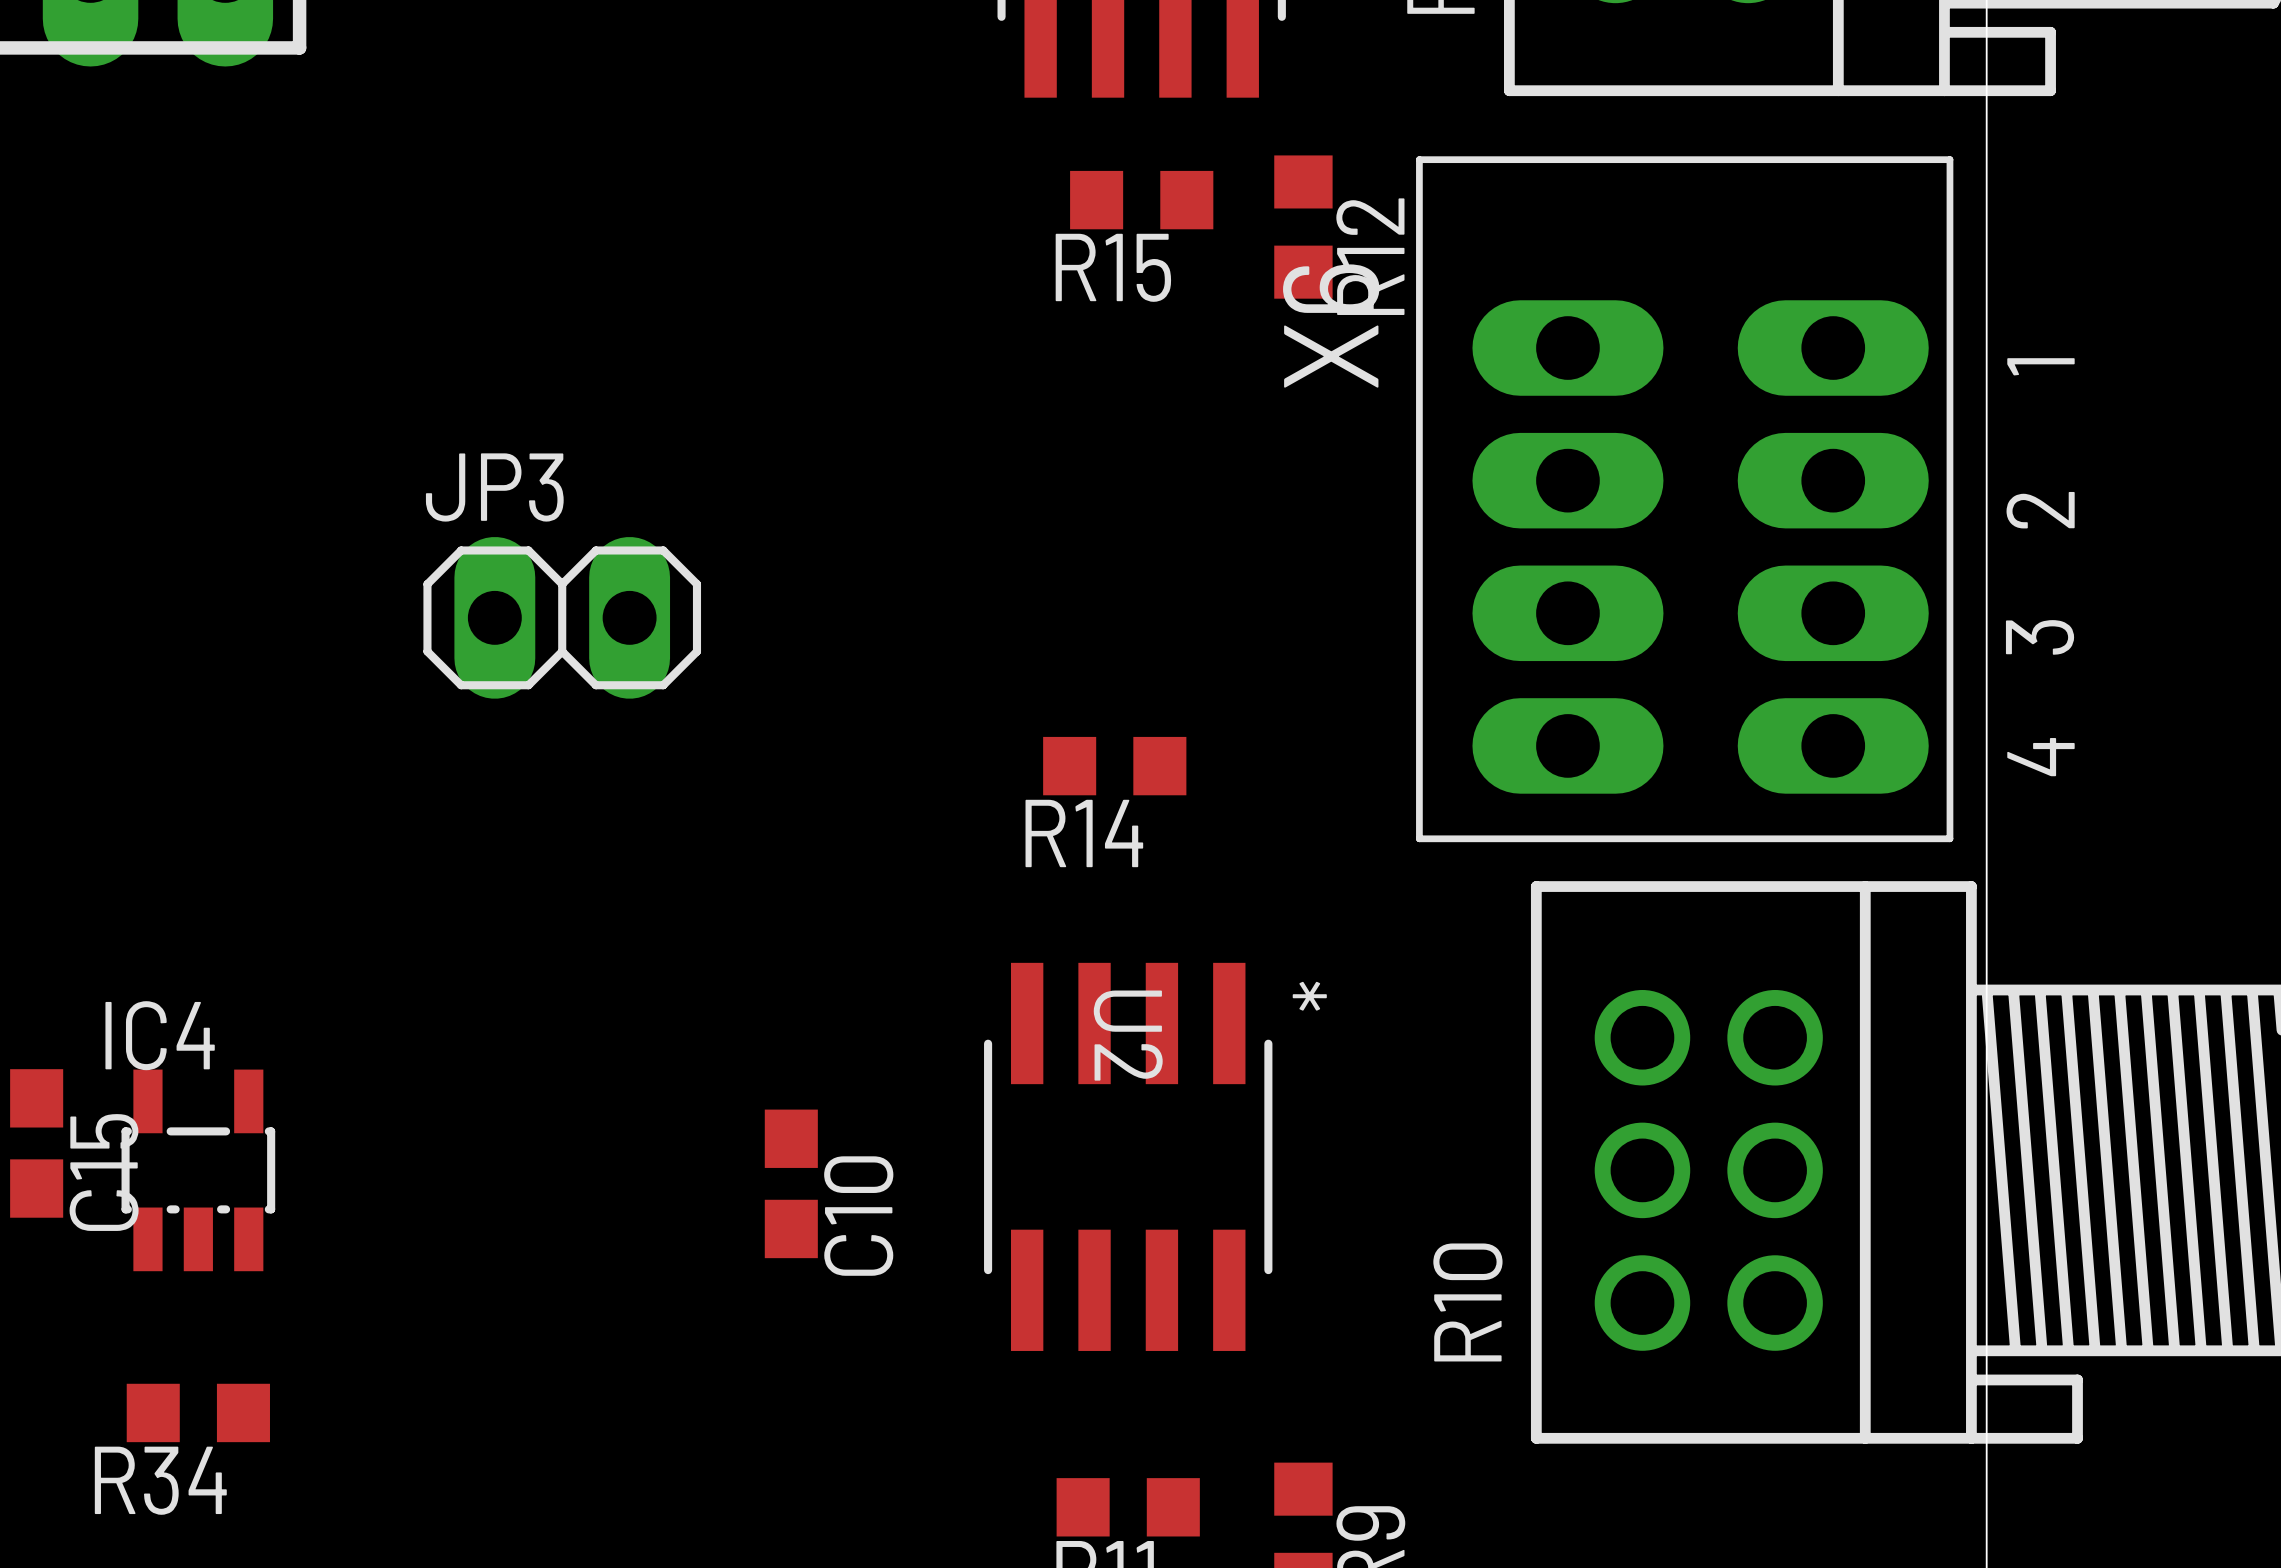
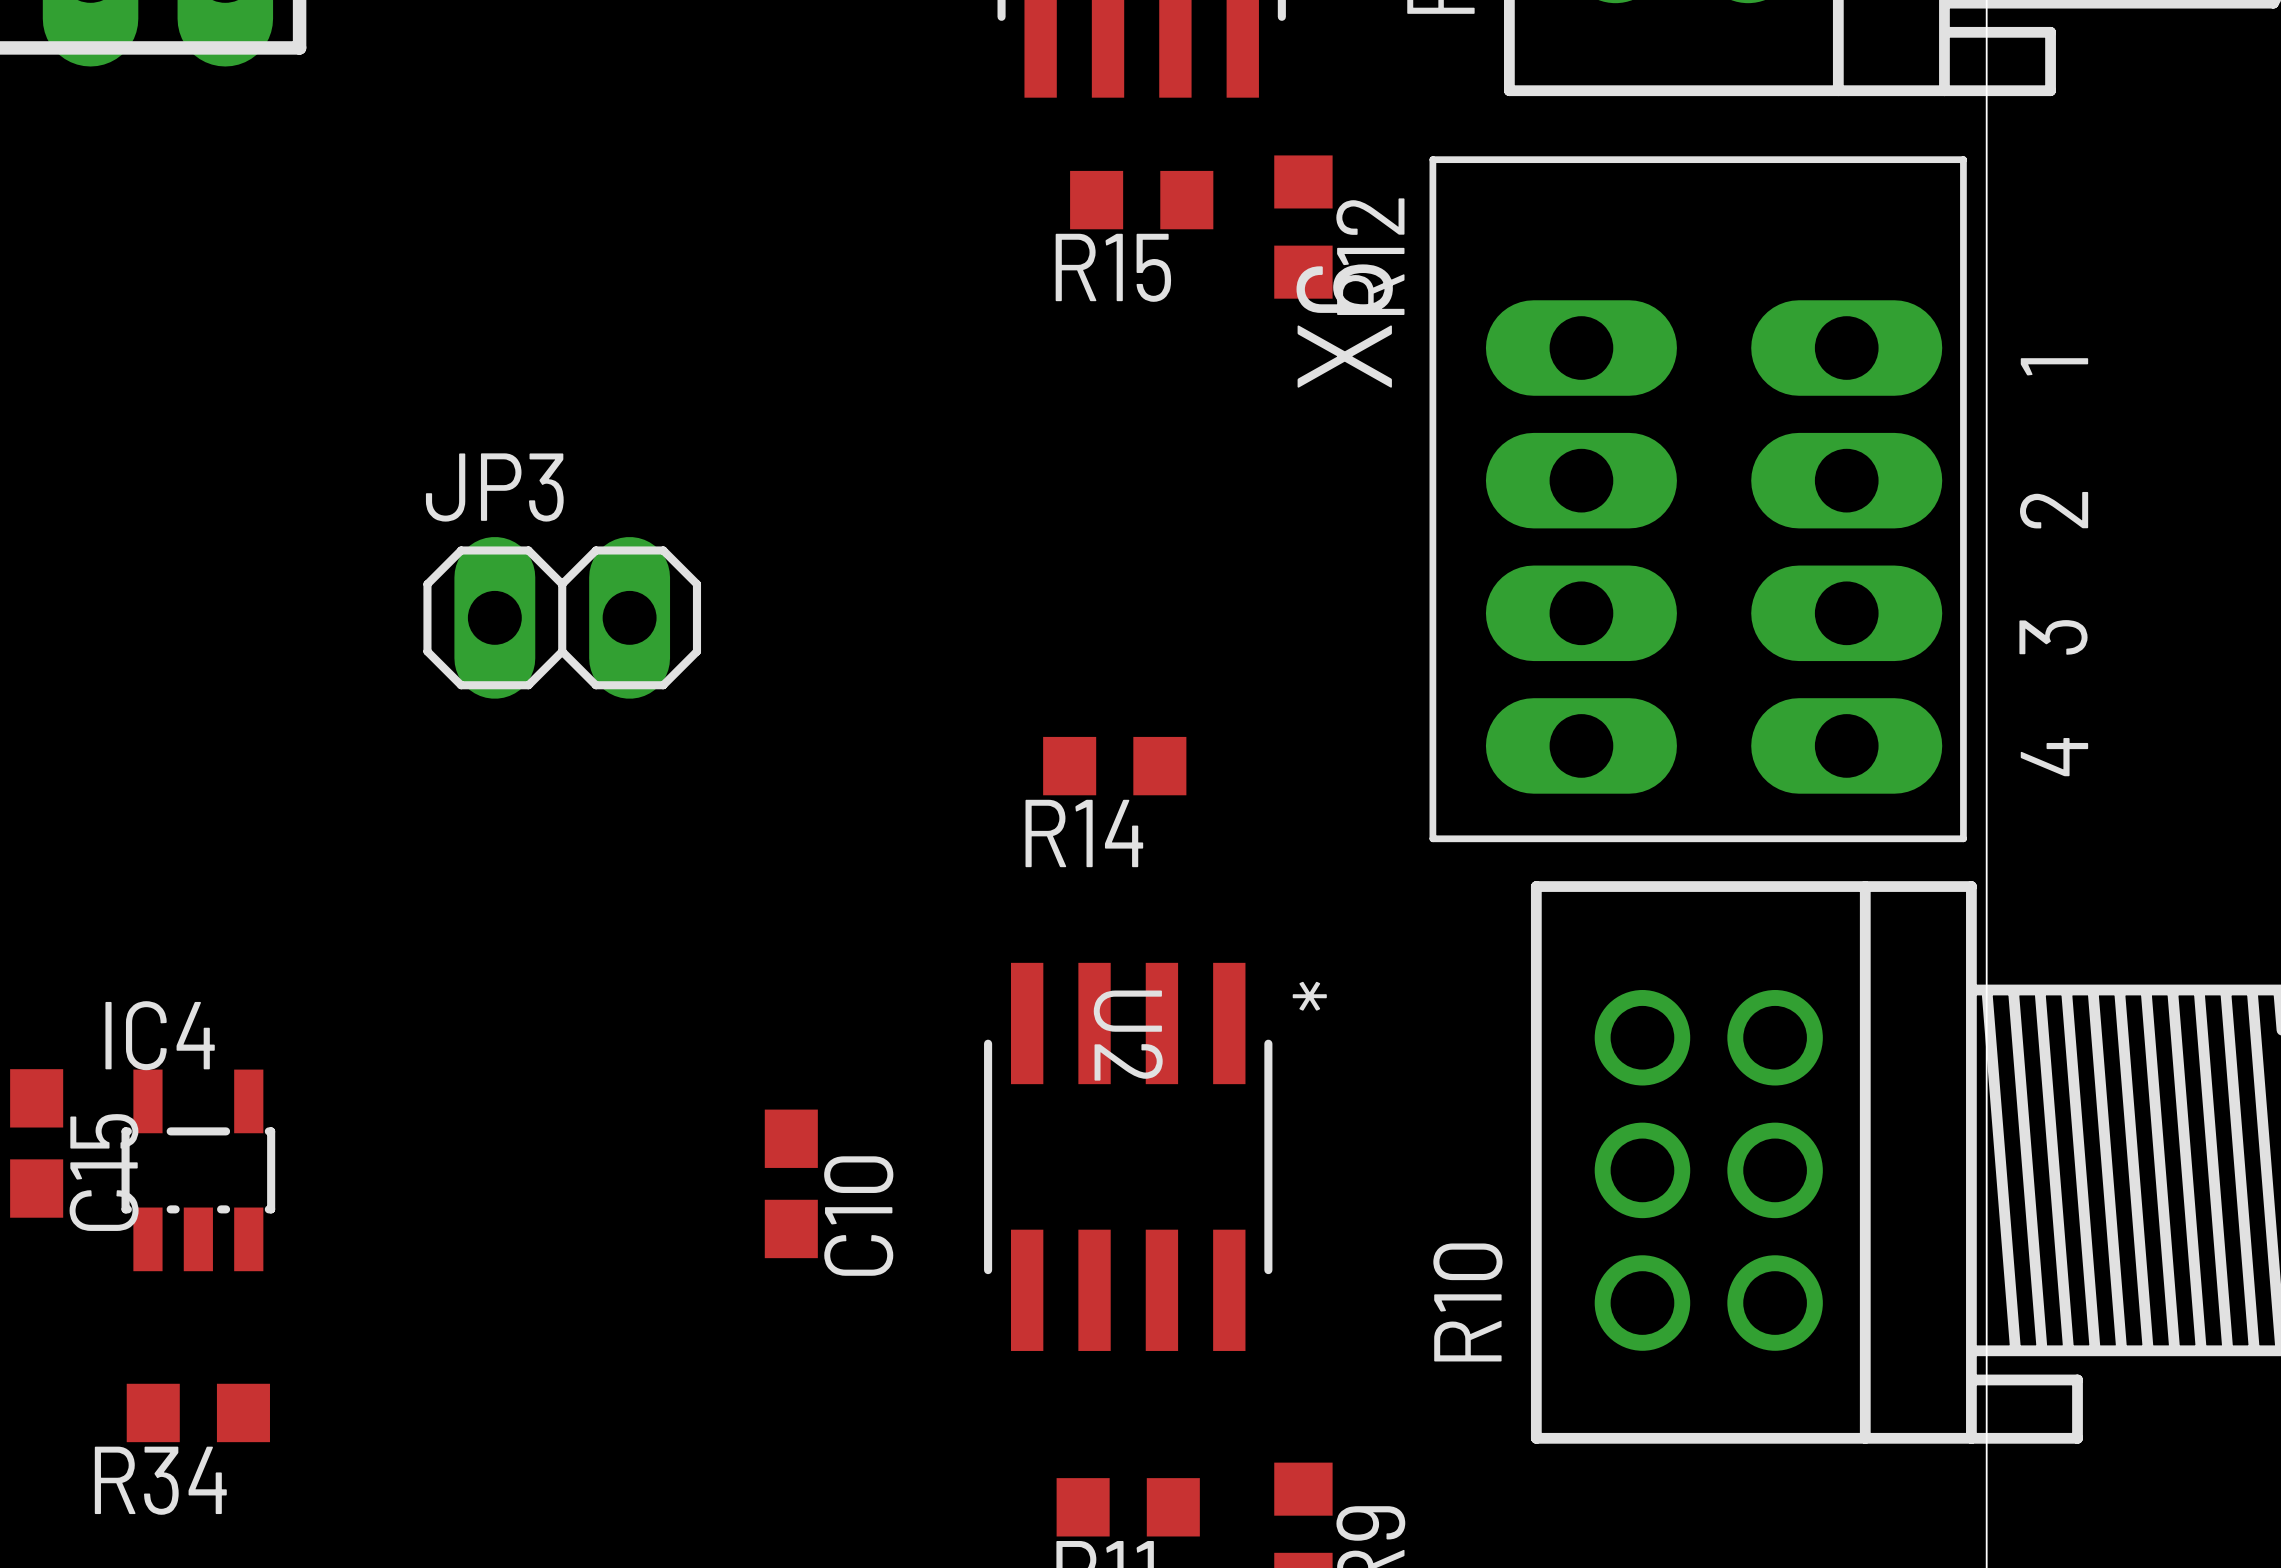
X6 position: (1684, 499) -> (1698, 499)

